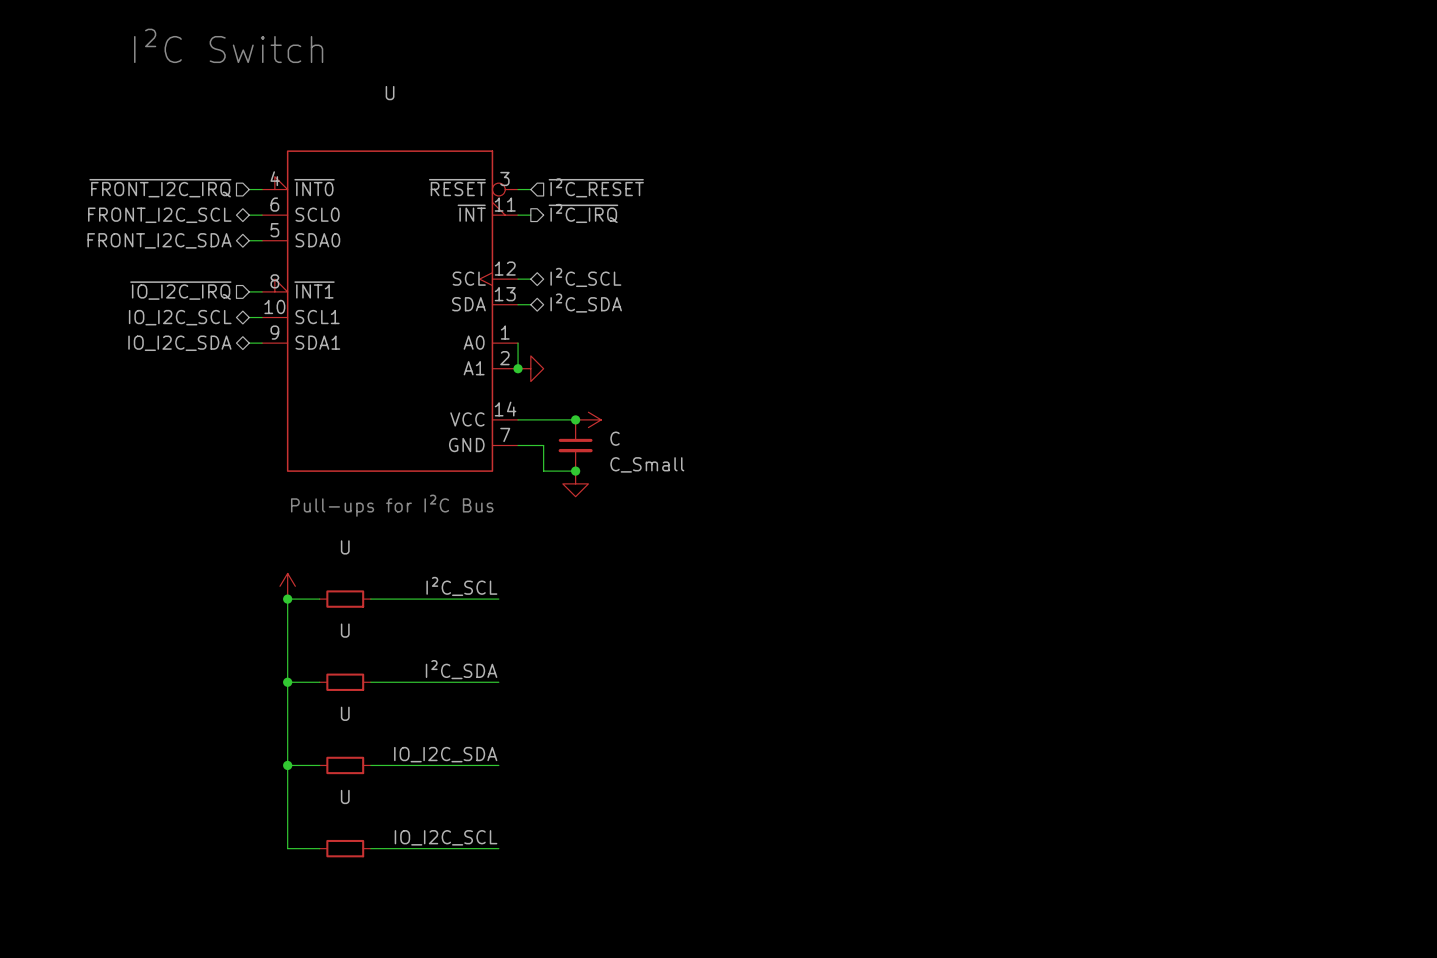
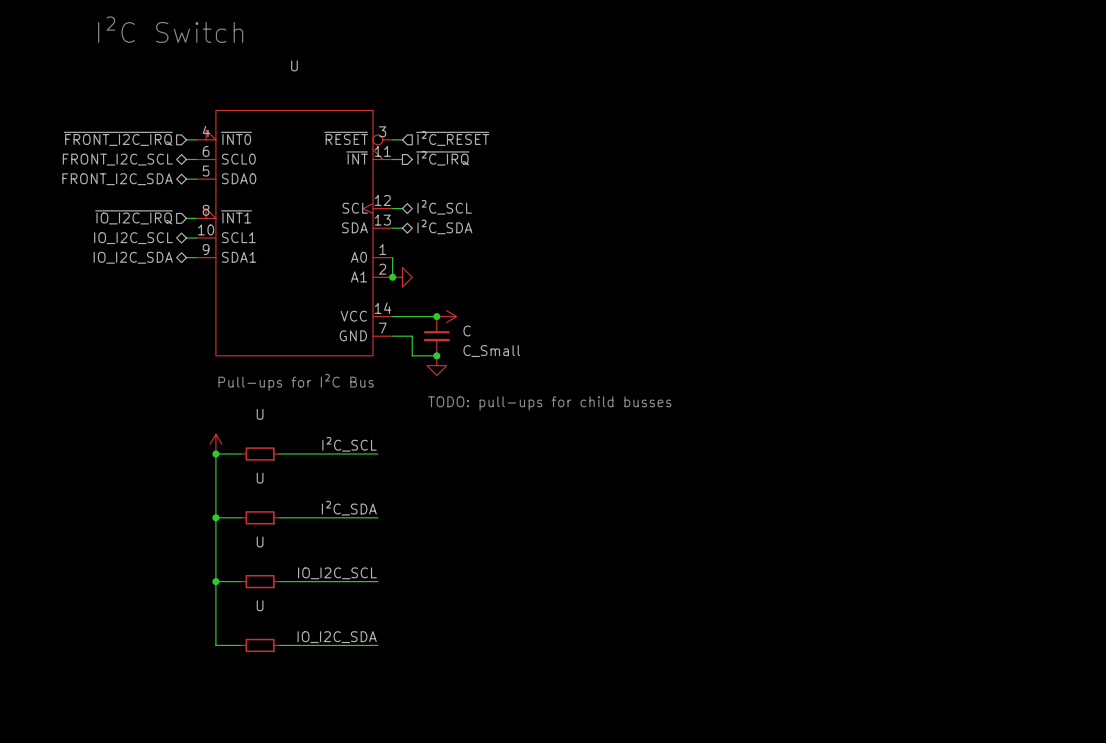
text: none -> TODO: pull-ups for child busses (549, 403)
label: IO_I2C_SDA (445, 754) -> IO_I2C_SCL (337, 573)
label: IO_I2C_SCL (446, 837) -> IO_I2C_SDA (337, 637)

